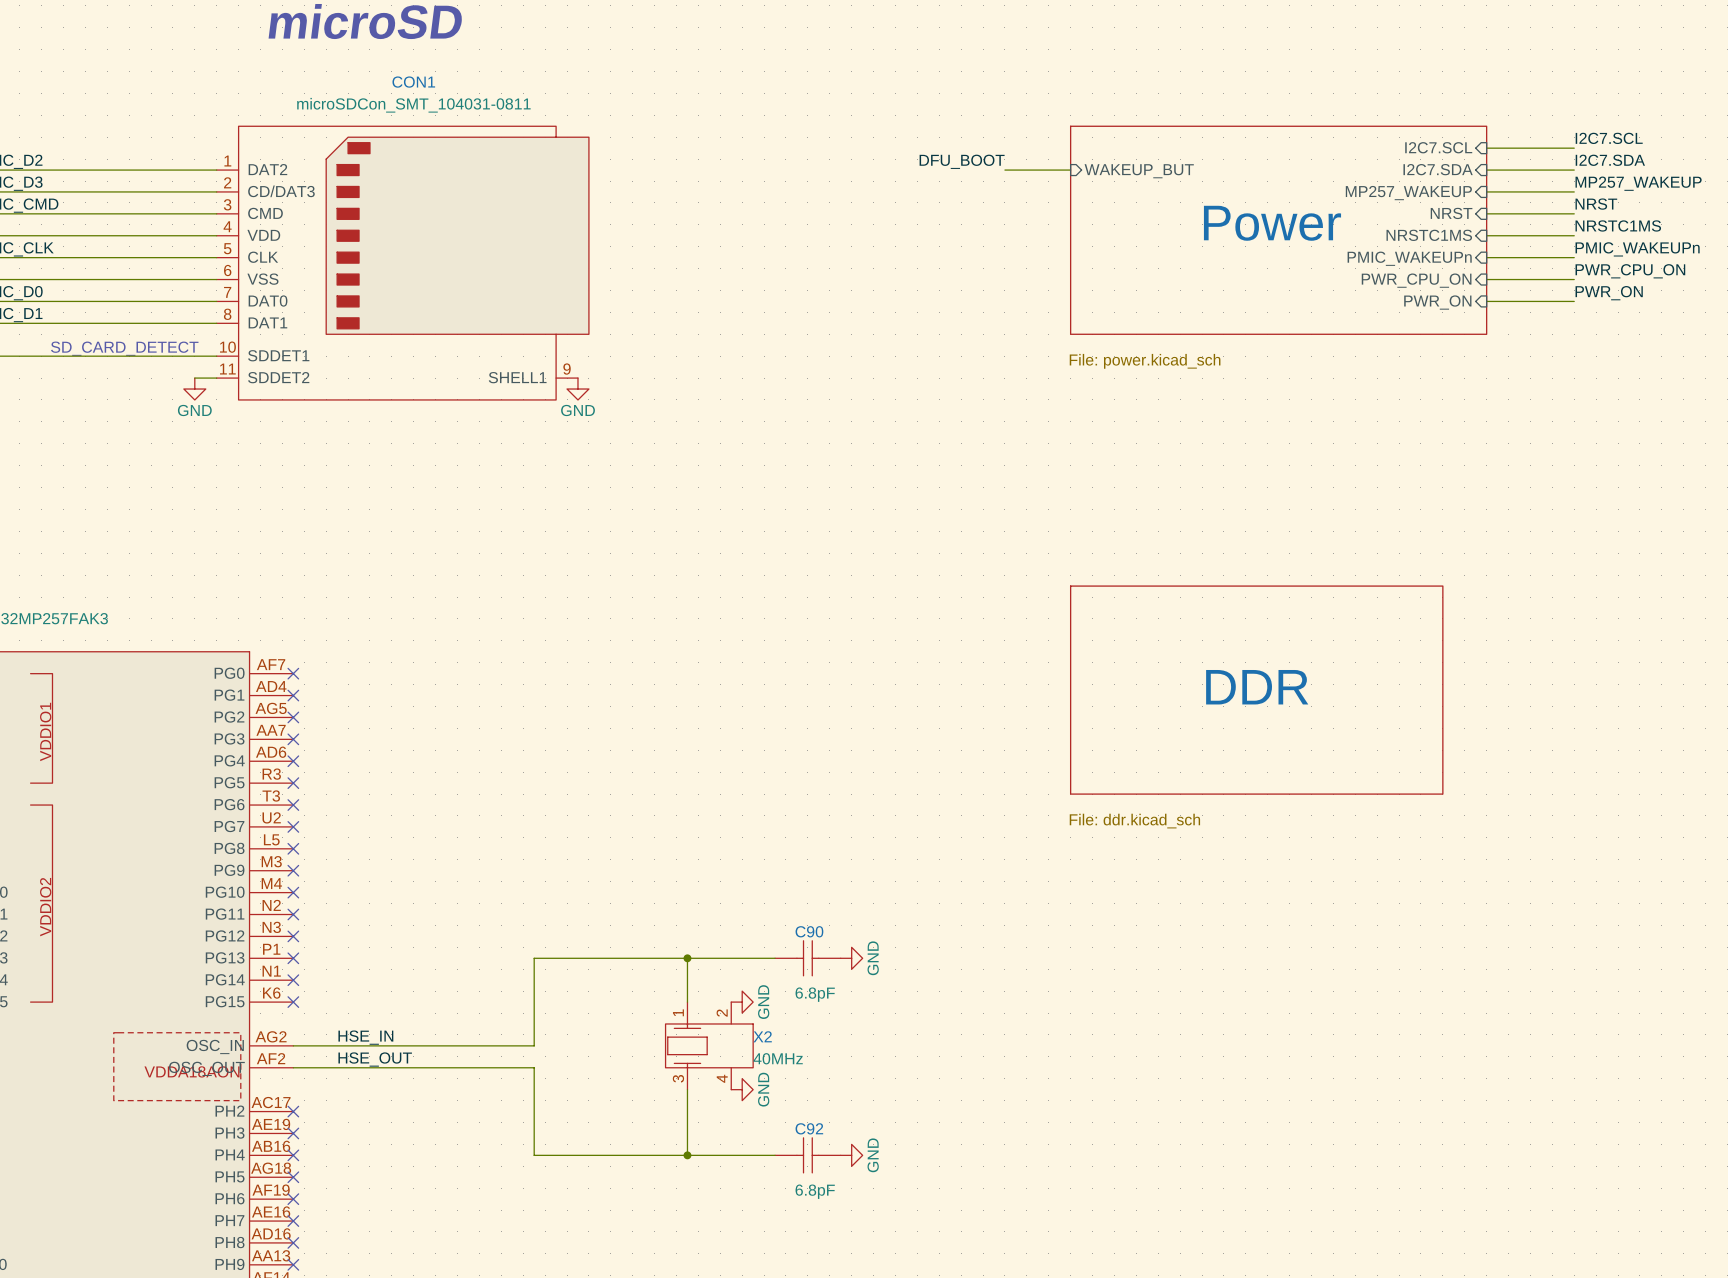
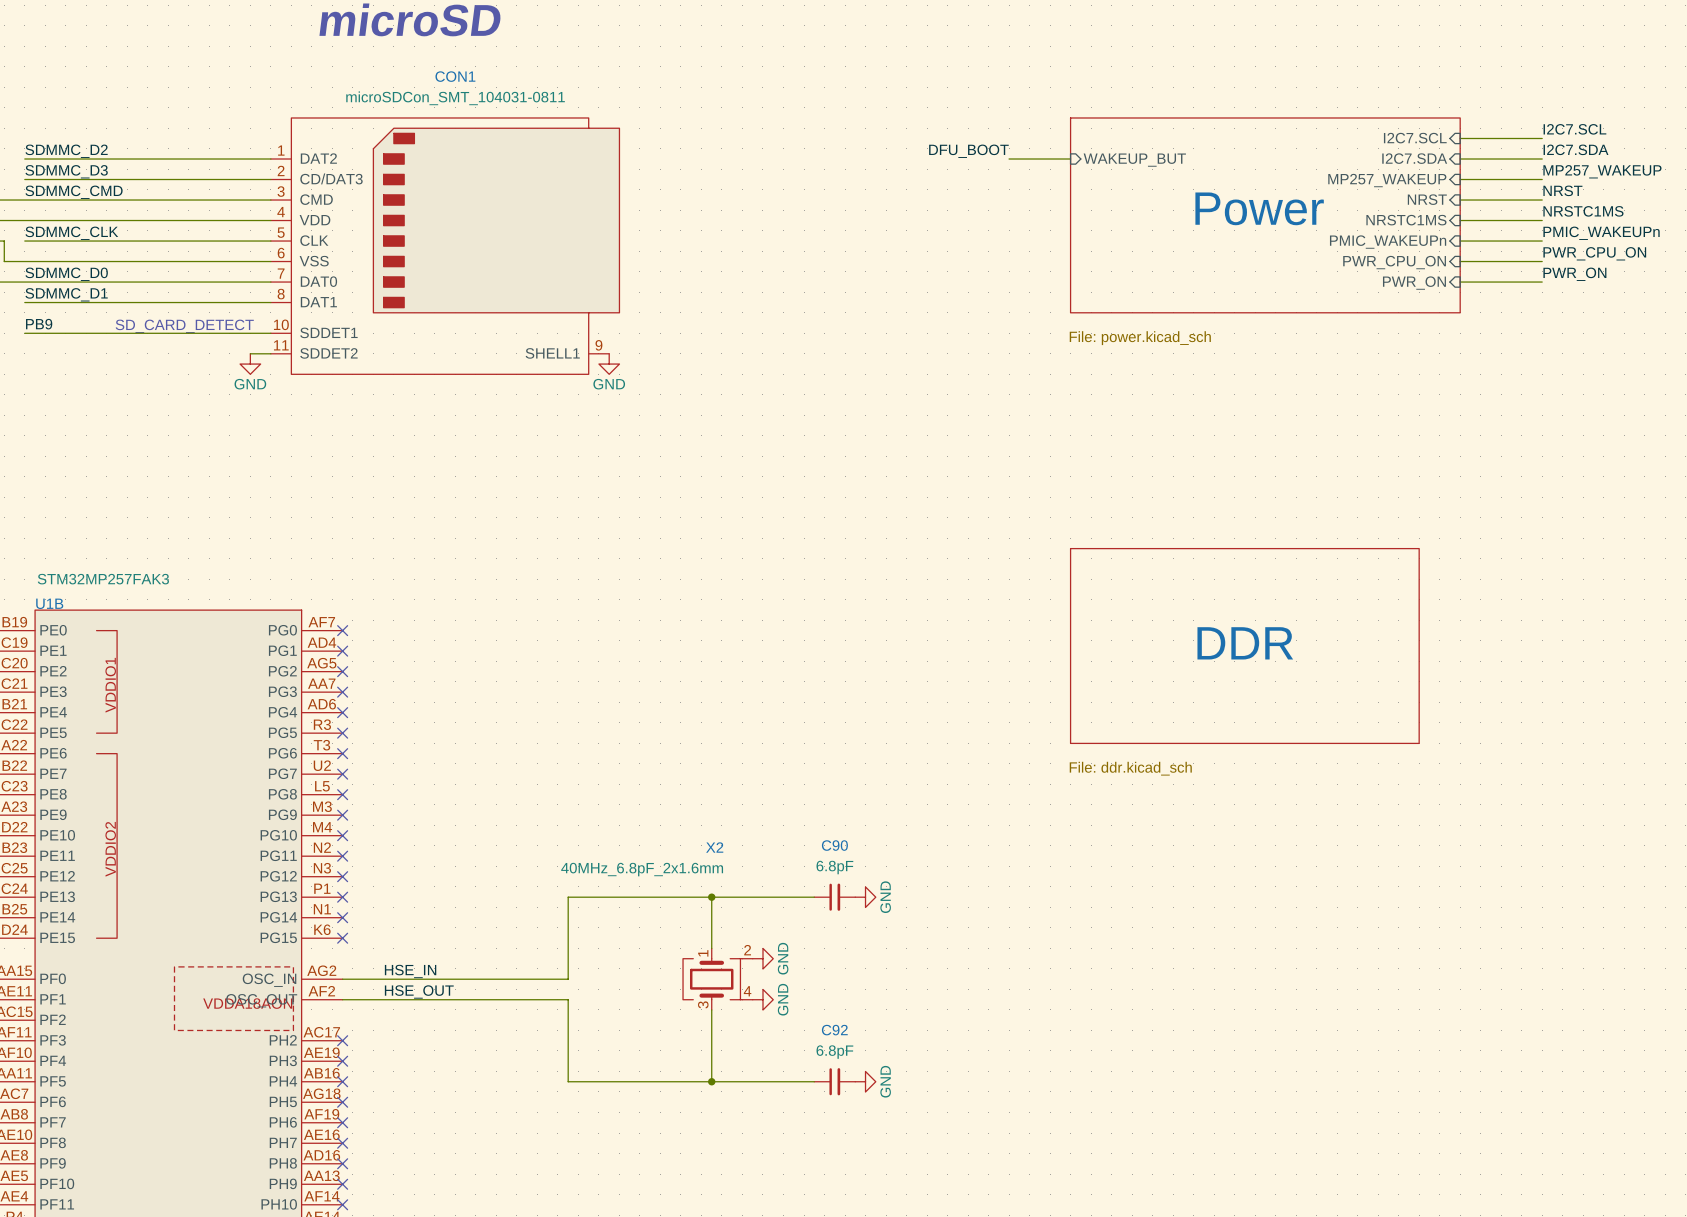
C90 text: none -> 6.8pF (834, 867)
X2 value: none -> 40MHz_6.8pF_2x1.6mm (642, 869)
C90 name position: C90 (809, 931) -> C90 (834, 845)
C90 symbol: [775, 940, 841, 976] -> [814, 883, 856, 911]
C90 text: 6.8pF (815, 994) -> none
X2 symbol: [665, 1002, 754, 1090] -> [683, 948, 753, 1010]
power symbol position: GND (742, 1002) -> GND (762, 958)
X2 name position: X2 (762, 1036) -> X2 (714, 847)
X2 text: 40MHz (778, 1058) -> none
power symbol position: GND (742, 1089) -> GND (762, 999)
C92 text: none -> 6.8pF (834, 1052)
C92 name position: C92 (809, 1128) -> C92 (834, 1030)
C92 symbol: [775, 1137, 841, 1173] -> [814, 1068, 856, 1096]
C92 text: 6.8pF (815, 1191) -> none

